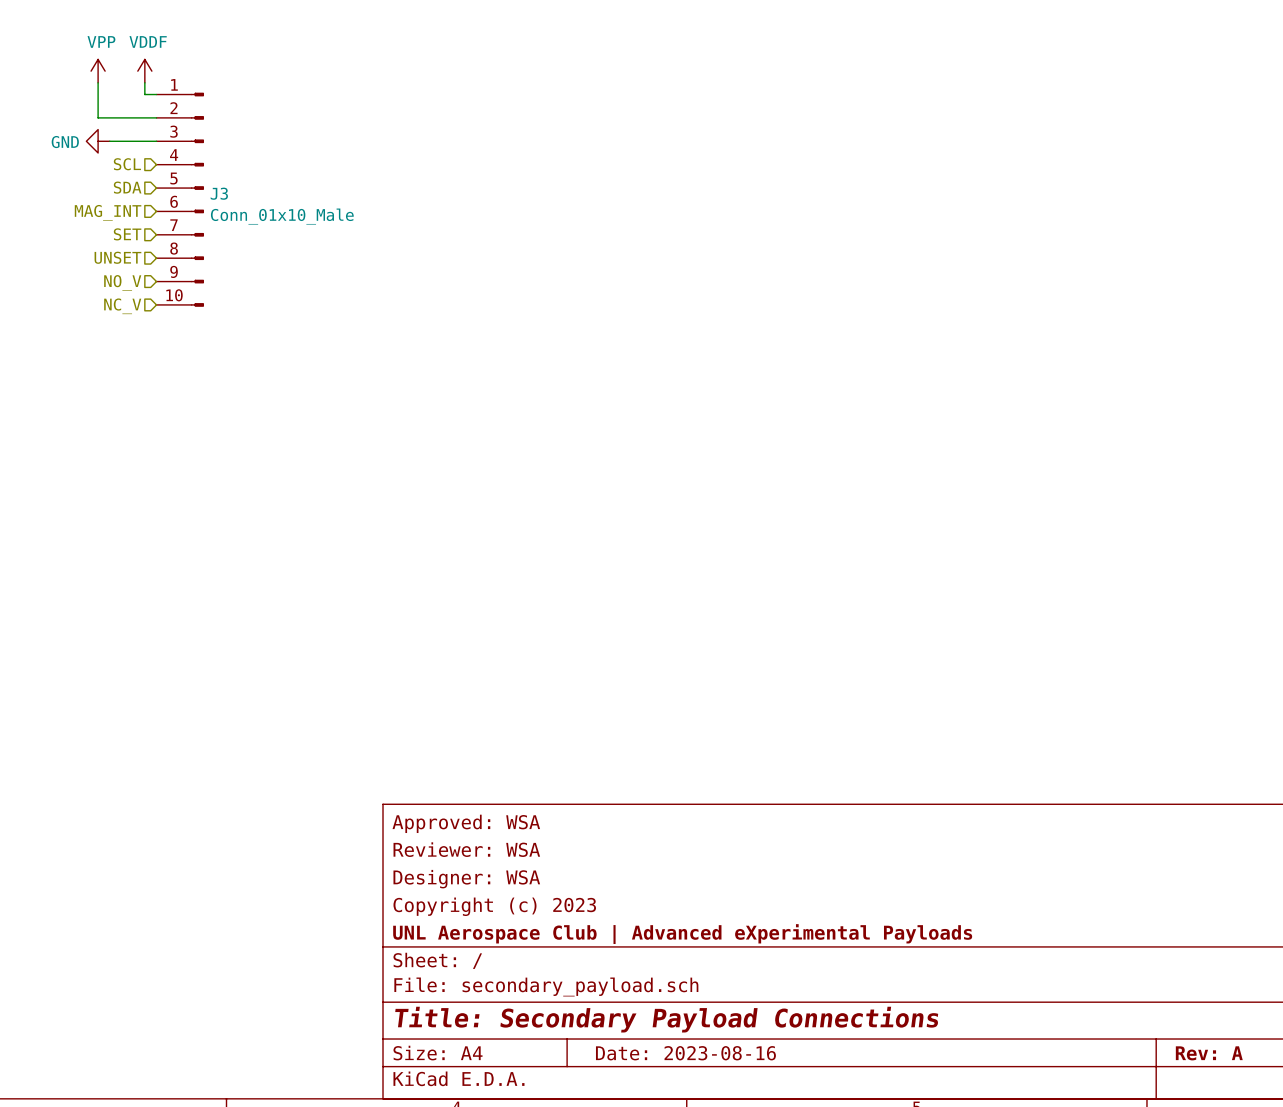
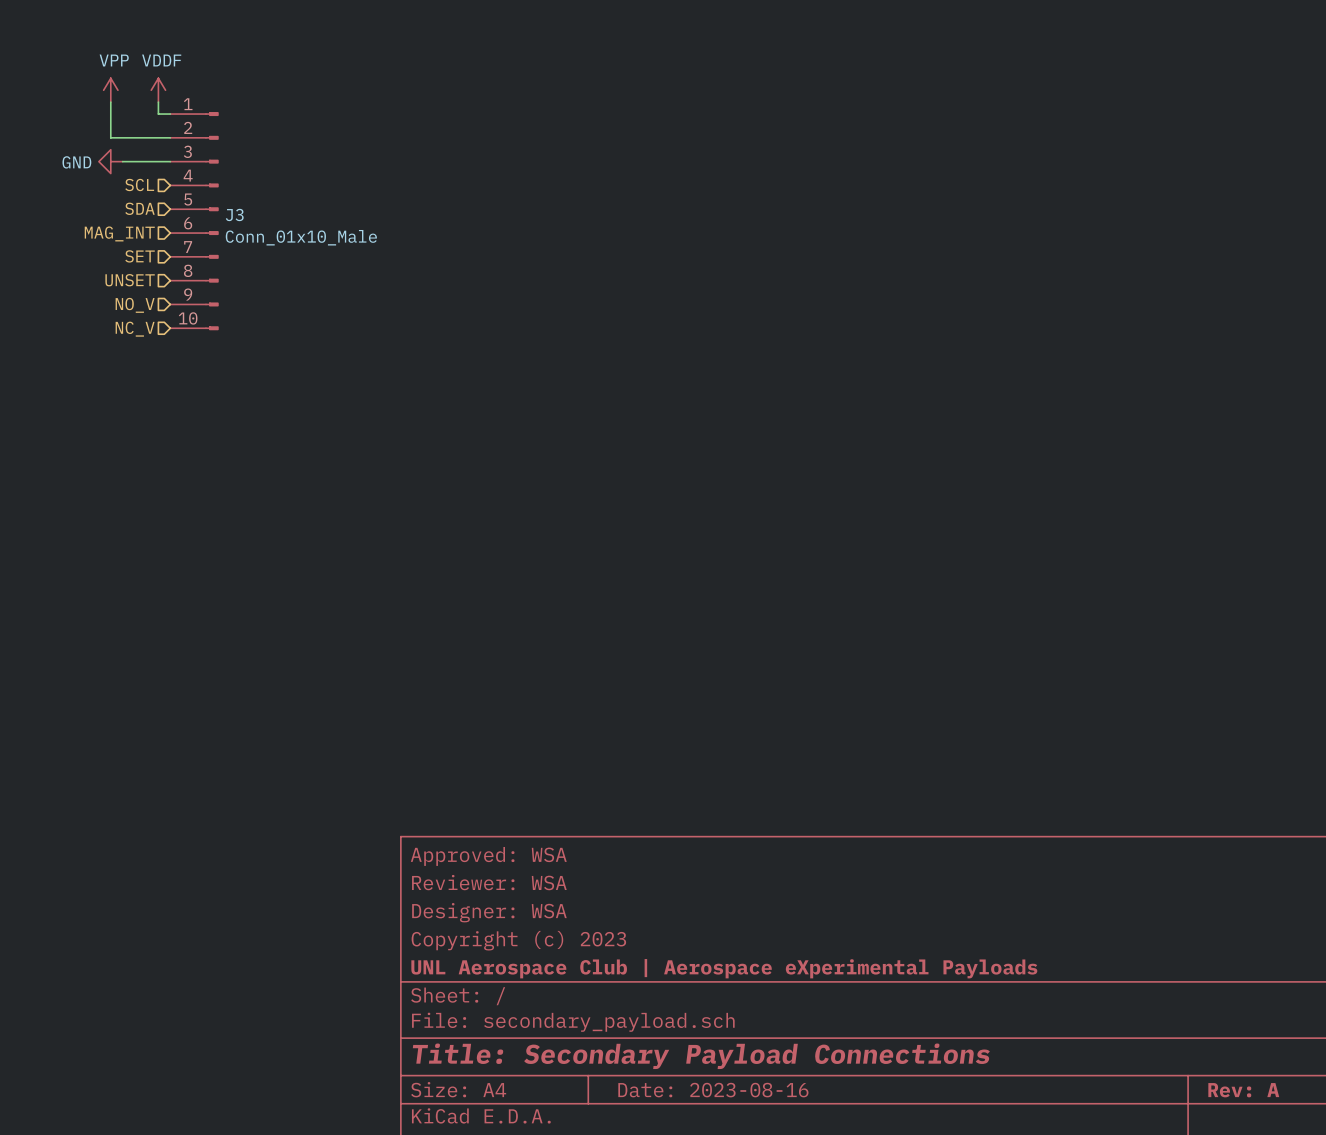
title block: UNL Aerospace Club | Advanced eXperimental Payloads (682, 934) -> UNL Aerospace Club | Aerospace eXperimental Payloads (724, 968)

